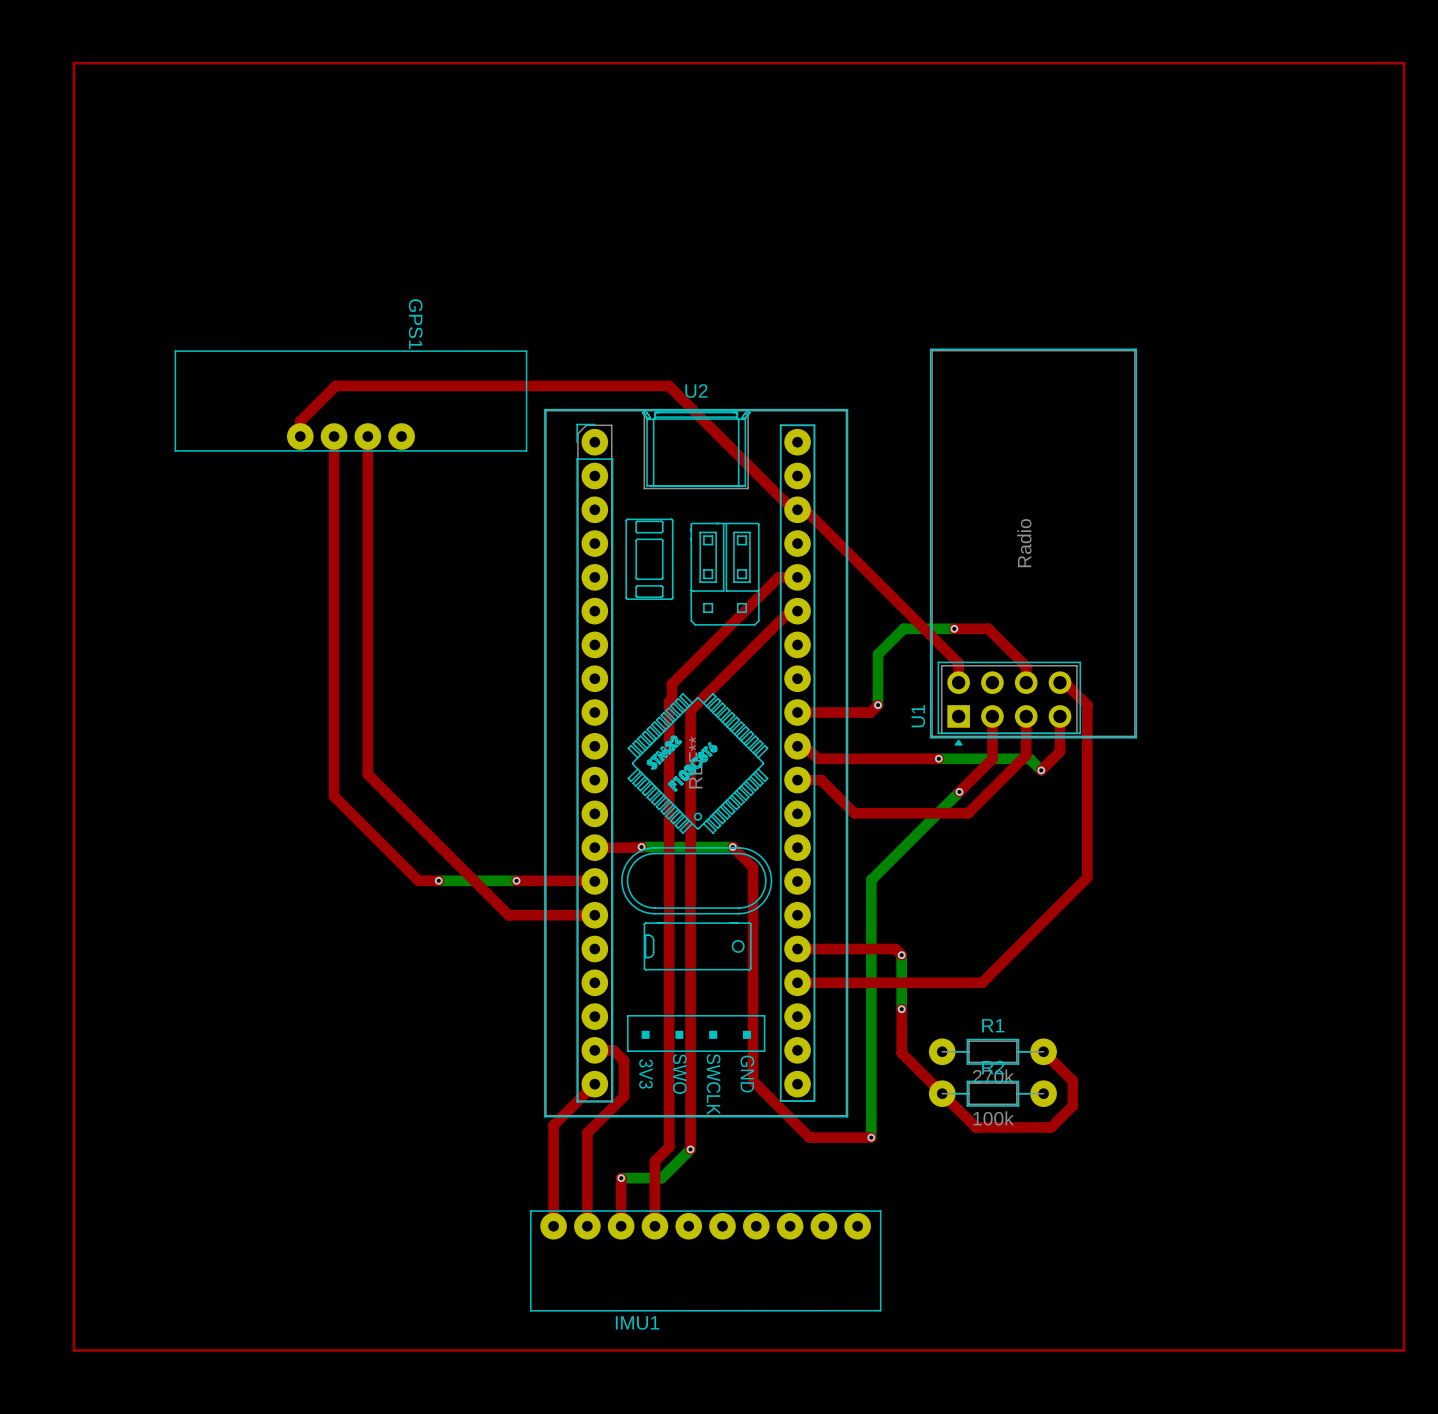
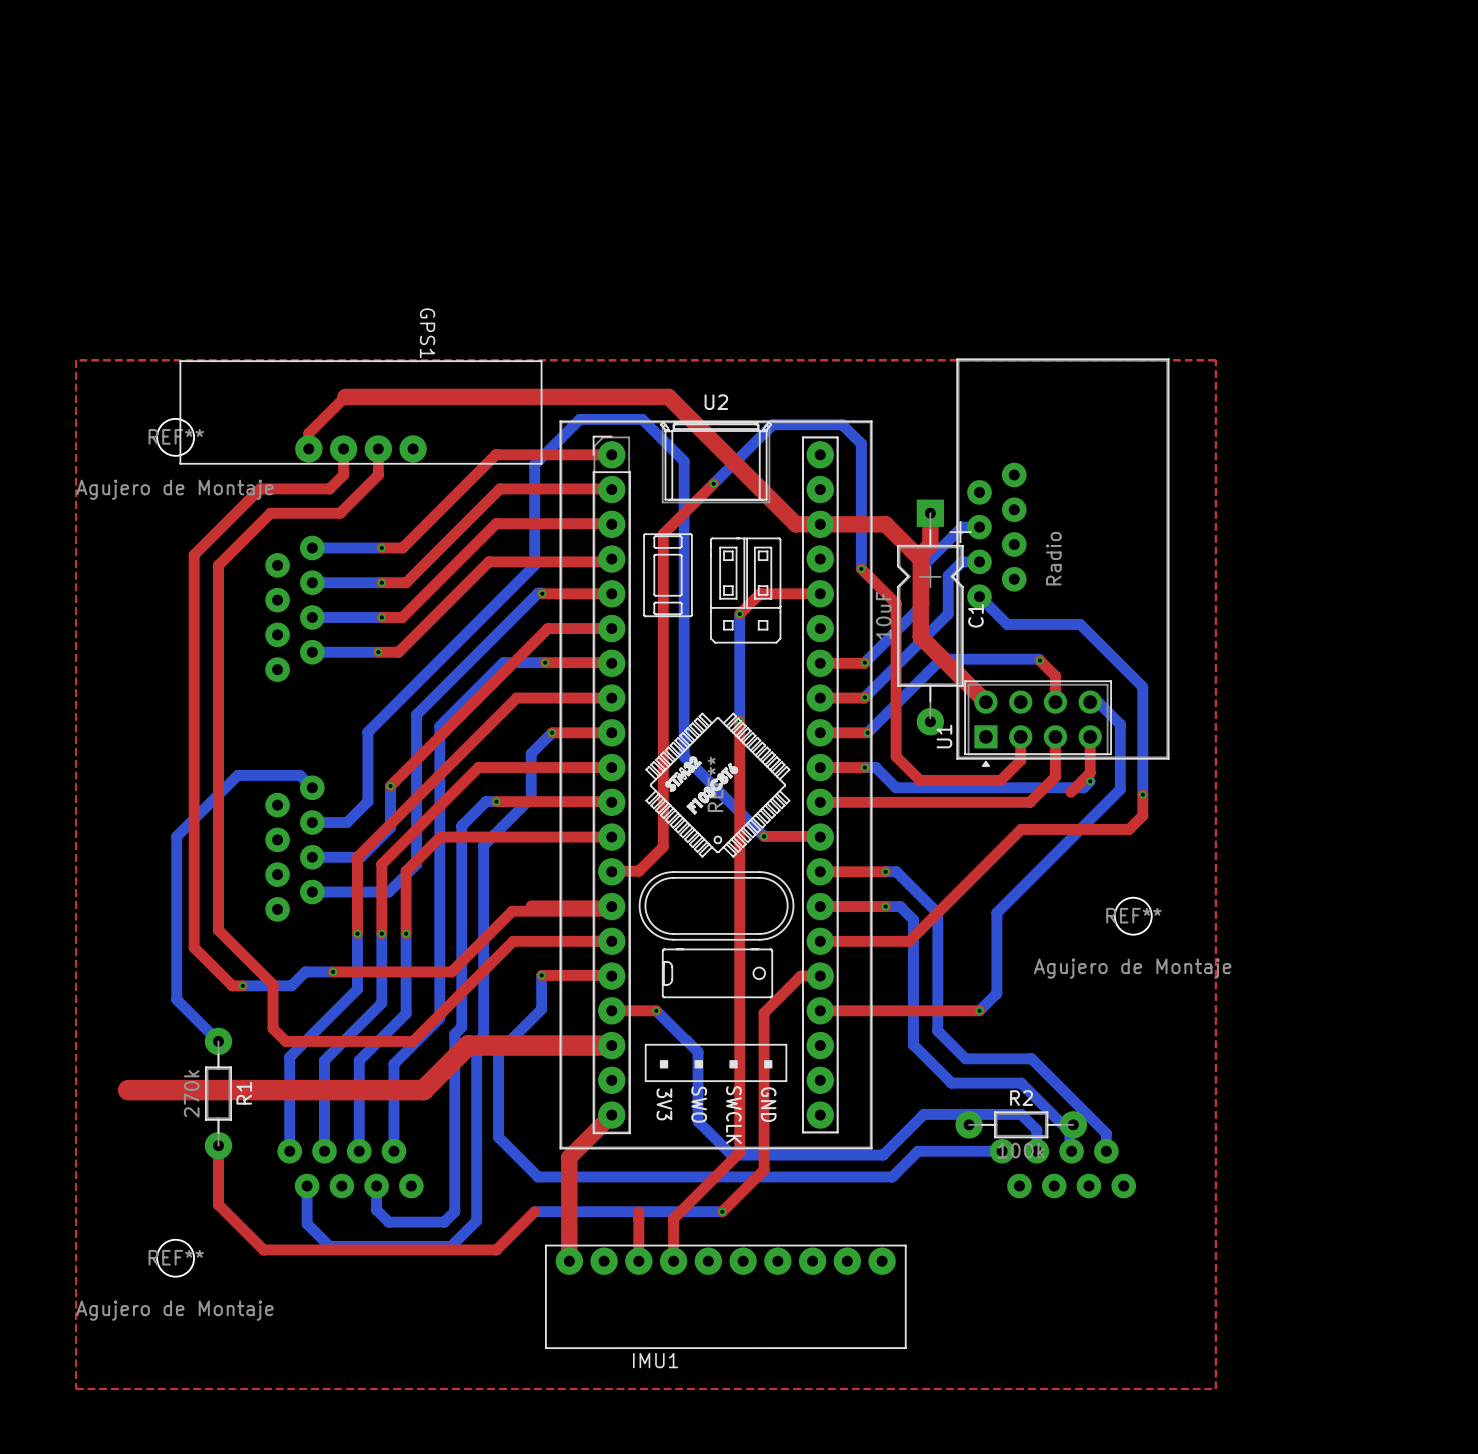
top track: (73, 63) (73, 1350) (1404, 1350) (1404, 63) (73, 63) -> none
top zone outline: none -> (76, 360) (1215, 360) (1215, 1388) (76, 1388) (76, 360)
top track width: thin (335, 385) (650, 385) -> thick (345, 396) (668, 396)
top track: (650, 385) (668, 385) (792, 509) -> (668, 396) (795, 524) (815, 524)
REF**: none -> Agujero de Montaje (175, 437)
top track: none -> (611, 454) (495, 454) (402, 547) (381, 547)
top track: (334, 461) (334, 796) (418, 880) (438, 880) -> (343, 475) (329, 488) (260, 488) (194, 554) (194, 947) (232, 985) (242, 985)
top track: (367, 461) (367, 774) (508, 915) -> (378, 475) (340, 513) (270, 513) (218, 565) (218, 930) (273, 984) (273, 1028) (285, 1041) (413, 1041) (513, 941) (523, 941)
top track: none -> (713, 483) (663, 534) (663, 846) (638, 871) (612, 871)
bottom track: none -> (713, 483) (772, 424) (842, 424) (861, 443) (861, 568)
via: none -> (713, 483)
top track: none -> (611, 489) (499, 488) (406, 582) (381, 582)
top track: none -> (611, 524) (496, 523) (402, 617) (381, 617)
top track: (805, 509) (958, 663) (958, 682) -> (930, 513) (930, 545) (920, 554) (920, 636) (985, 702)
top track: none -> (828, 524) (885, 524) (920, 559)
bottom track: none -> (979, 527) (962, 527) (923, 565) (923, 603) (864, 662)
part: none -> (996, 535)
bottom track: none -> (312, 547) (381, 547)
via: none -> (381, 547)
top track: none -> (611, 559) (608, 561) (488, 561) (398, 652) (378, 652)
bottom track: none -> (979, 561) (962, 561) (948, 575) (948, 614) (864, 697)
top track: none -> (861, 568) (896, 603) (896, 756) (920, 780)
via: none -> (861, 568)
bottom track: none -> (312, 582) (381, 582)
via: none -> (381, 582)
top track: none -> (542, 593) (611, 593)
bottom track: none -> (542, 593) (538, 593) (416, 714) (416, 864) (388, 892) (312, 892)
via: none -> (542, 593)
top track: (778, 577) (671, 684) (671, 699) (669, 701) (669, 1147) (654, 1161) (654, 1185) -> (739, 720) (739, 1152) (673, 1218)
top track: none -> (800, 593) (759, 593) (739, 614)
bottom track: none -> (979, 596) (1007, 624) (1080, 624) (1142, 686) (1142, 794)
part: none -> (294, 608)
bottom track: none -> (739, 614) (739, 720)
via: none -> (739, 614)
bottom track: none -> (312, 617) (381, 617)
via: none -> (381, 617)
C1: none -> 10uF (934, 617)
top track: none -> (611, 628) (547, 628) (390, 786)
top track: (800, 615) (785, 615) (690, 710) (690, 1149) -> none
top track: (954, 628) (988, 628) (1026, 666) -> (1039, 660) (1055, 676) (1055, 685)
bottom track: (954, 628) (903, 628) (878, 654) (878, 705) -> none
via: (954, 628) -> none
bottom track: none -> (312, 652) (378, 652)
via: none -> (378, 652)
bottom track: none -> (1039, 660) (941, 659) (867, 732)
via: none -> (1039, 660)
top track: none -> (545, 662) (611, 663)
bottom track: none -> (545, 662) (503, 662) (439, 726) (439, 1018) (393, 1064) (393, 1151)
via: none -> (545, 662)
top track: none -> (864, 662) (820, 663)
via: none -> (864, 662)
top track: none -> (611, 698) (516, 698) (357, 857) (357, 933)
top track: none -> (864, 697) (820, 698)
via: none -> (864, 697)
top track: (1060, 682) (1064, 682) (1087, 705) (1087, 877) (982, 982) (952, 982) -> none
bottom track: none -> (1090, 702) (1098, 702) (1120, 724) (1120, 789) (996, 912) (996, 993) (979, 1010)
via: none -> (739, 720)
top track: (878, 705) (870, 712) (843, 712) -> none
via: (878, 705) -> none
top track: none -> (552, 732) (611, 732)
bottom track: none -> (552, 732) (531, 753) (531, 797) (483, 845) (483, 1036) (476, 1043) (476, 1220) (451, 1246) (329, 1246) (307, 1223) (307, 1186)
via: none -> (552, 732)
via: none -> (867, 732)
top track: (992, 739) (992, 758) (959, 791) -> (1020, 760) (1000, 780) (965, 780)
top track: none -> (611, 767) (478, 767) (381, 864) (381, 933)
top track: (797, 746) (802, 750) (809, 750) (817, 758) (894, 758) -> (820, 767) (864, 767)
bottom track: none -> (864, 767) (875, 767) (896, 787) (1083, 787) (1090, 781)
via: none -> (864, 767)
bottom track: (938, 758) (1029, 758) (1041, 770) -> none
via: (938, 758) -> none
bottom track: none -> (390, 786) (390, 827) (360, 857) (312, 857)
via: none -> (390, 786)
bottom track: none -> (312, 787) (300, 775) (237, 775) (176, 836) (176, 999) (218, 1041)
via position: (1041, 770) -> (1090, 781)
top track: none -> (1142, 794) (1142, 815) (1129, 829) (1021, 829) (909, 941) (820, 941)
via: none -> (1142, 794)
top track: none -> (496, 801) (611, 802)
bottom track: none -> (496, 801) (486, 801) (461, 825) (461, 1027) (454, 1034) (454, 1211) (444, 1222) (388, 1222) (376, 1209) (376, 1186)
via: none -> (496, 801)
top track: (821, 780) (854, 813) (968, 813) (1001, 780) -> (844, 802) (1029, 802)
bottom track: (959, 791) (871, 880) (871, 1137) -> none
via: (959, 791) -> none
bottom track: none -> (312, 822) (347, 822) (367, 801) (367, 732) (534, 565) (534, 464) (579, 419) (642, 419) (684, 461) (684, 756) (764, 836)
top track: none -> (611, 837) (440, 837) (406, 871) (406, 933)
top track: none -> (764, 836) (820, 837)
part: none -> (294, 848)
top track: (641, 847) (594, 847) -> none
bottom track: (641, 847) (732, 847) -> none
via: (641, 847) -> none
top track: (732, 847) (753, 867) (753, 1081) (809, 1137) (871, 1137) -> none
via position: (732, 847) -> (764, 836)
top track: none -> (820, 871) (885, 871)
bottom track: none -> (886, 871) (896, 871) (937, 913) (937, 1031) (965, 1058) (1031, 1058) (1106, 1133) (1106, 1151)
via: none -> (885, 871)
bottom track: (438, 880) (516, 880) -> none
via: (438, 880) -> none
via: (516, 880) -> none
top track: none -> (820, 906) (885, 906)
bottom track: none -> (885, 906) (900, 906) (913, 919) (913, 1044) (951, 1083) (1021, 1083) (1069, 1131) (1069, 1149) (1071, 1151)
via: none -> (885, 906)
top track: none -> (610, 907) (607, 911) (512, 911) (451, 971) (333, 971)
REF**: none -> Agujero de Montaje (1133, 916)
bottom track: none -> (357, 933) (357, 989) (289, 1057) (289, 1151)
via: none -> (357, 933)
bottom track: none -> (381, 933) (381, 1003) (324, 1060) (324, 1151)
via: none -> (381, 933)
bottom track: none -> (406, 933) (406, 1013) (359, 1060) (359, 1151)
via: none -> (406, 933)
bottom track: none -> (333, 971) (305, 971) (291, 985) (242, 985)
via: none -> (333, 971)
top track: none -> (541, 975) (611, 976)
bottom track: none -> (541, 975) (541, 1009) (498, 1052) (498, 1137) (538, 1176) (892, 1176) (918, 1151) (1002, 1151)
via: none -> (541, 975)
top track: (797, 949) (895, 949) (901, 955) -> (820, 976) (800, 976) (764, 1012) (764, 1170) (722, 1211)
bottom track: (901, 955) (901, 1009) -> none
via: (901, 955) -> none
via: none -> (242, 985)
top track: none -> (611, 1010) (656, 1010)
bottom track: none -> (656, 1010) (698, 1051) (698, 1121) (731, 1155) (883, 1155) (923, 1114) (1021, 1114) (1036, 1130) (1036, 1151)
via: none -> (656, 1010)
via: none -> (979, 1010)
top track: (901, 1009) (901, 1053) (976, 1127) (1051, 1127) (1072, 1105) (1072, 1081) (1043, 1051) -> none
via: (901, 1009) -> none
top track: none -> (611, 1045) (468, 1045) (423, 1090) (128, 1090)
top track: (594, 1050) (613, 1050) (624, 1060) (624, 1096) (587, 1133) (587, 1226) -> none
R1 rotation: 0° (992, 1051) -> 90° clockwise (218, 1093)
R1 position: (992, 1051) -> (218, 1093)
top track width: thin (594, 1084) (553, 1125) (553, 1226) -> thick (611, 1115) (569, 1157) (569, 1261)
top track: none -> (218, 1145) (218, 1204) (263, 1249) (496, 1249) (534, 1211)
part: none -> (350, 1168)
part: none -> (1062, 1168)
via: (871, 1137) -> none
bottom track: (690, 1149) (661, 1178) -> (722, 1211) (680, 1211)
via position: (690, 1149) -> (722, 1211)
bottom track: none -> (534, 1211) (638, 1211)
via: (621, 1178) -> none
REF**: none -> Agujero de Montaje (175, 1258)

